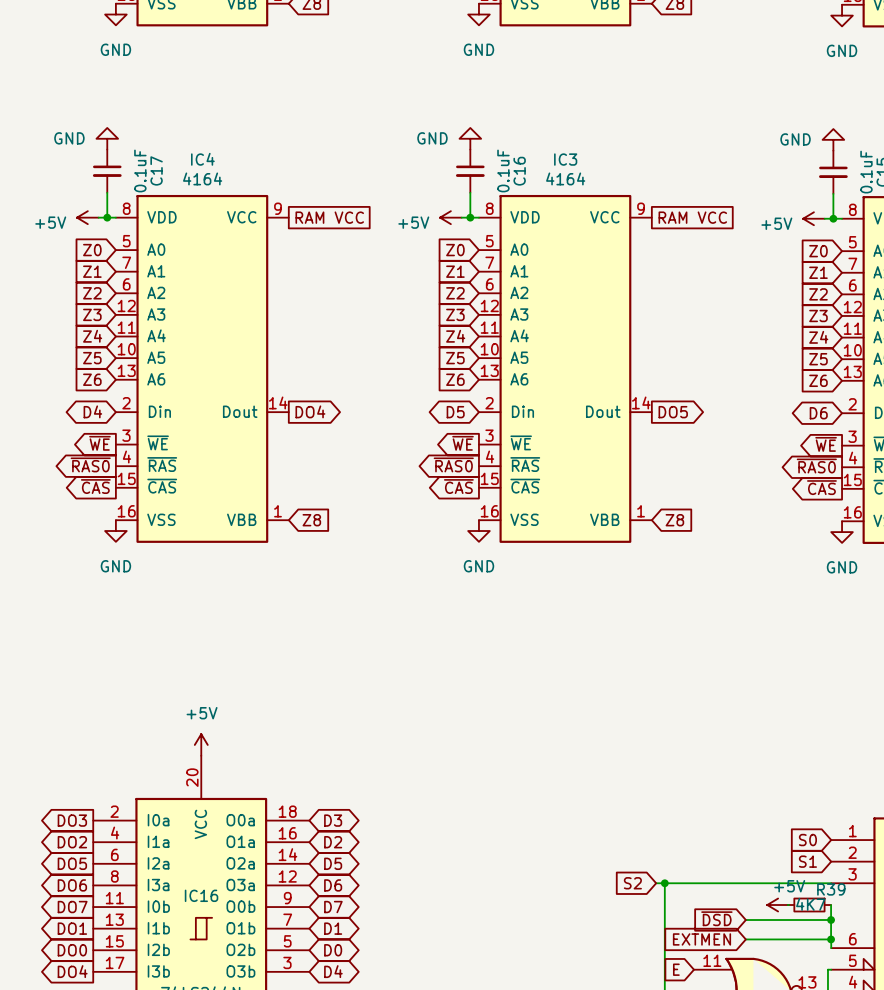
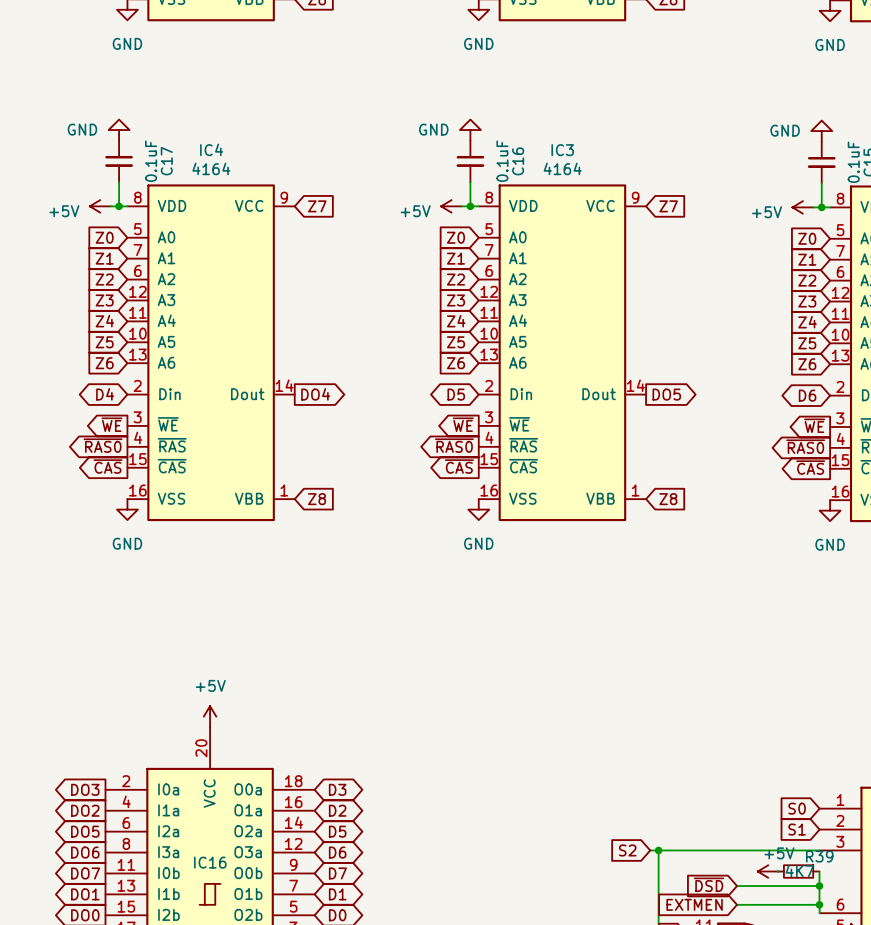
global label shape: passive (329, 217) -> input (317, 206)
global label: RAM VCC (329, 217) -> Z7 (317, 206)
global label shape: passive (692, 217) -> input (668, 206)
global label: RAM VCC (692, 217) -> Z7 (668, 206)

